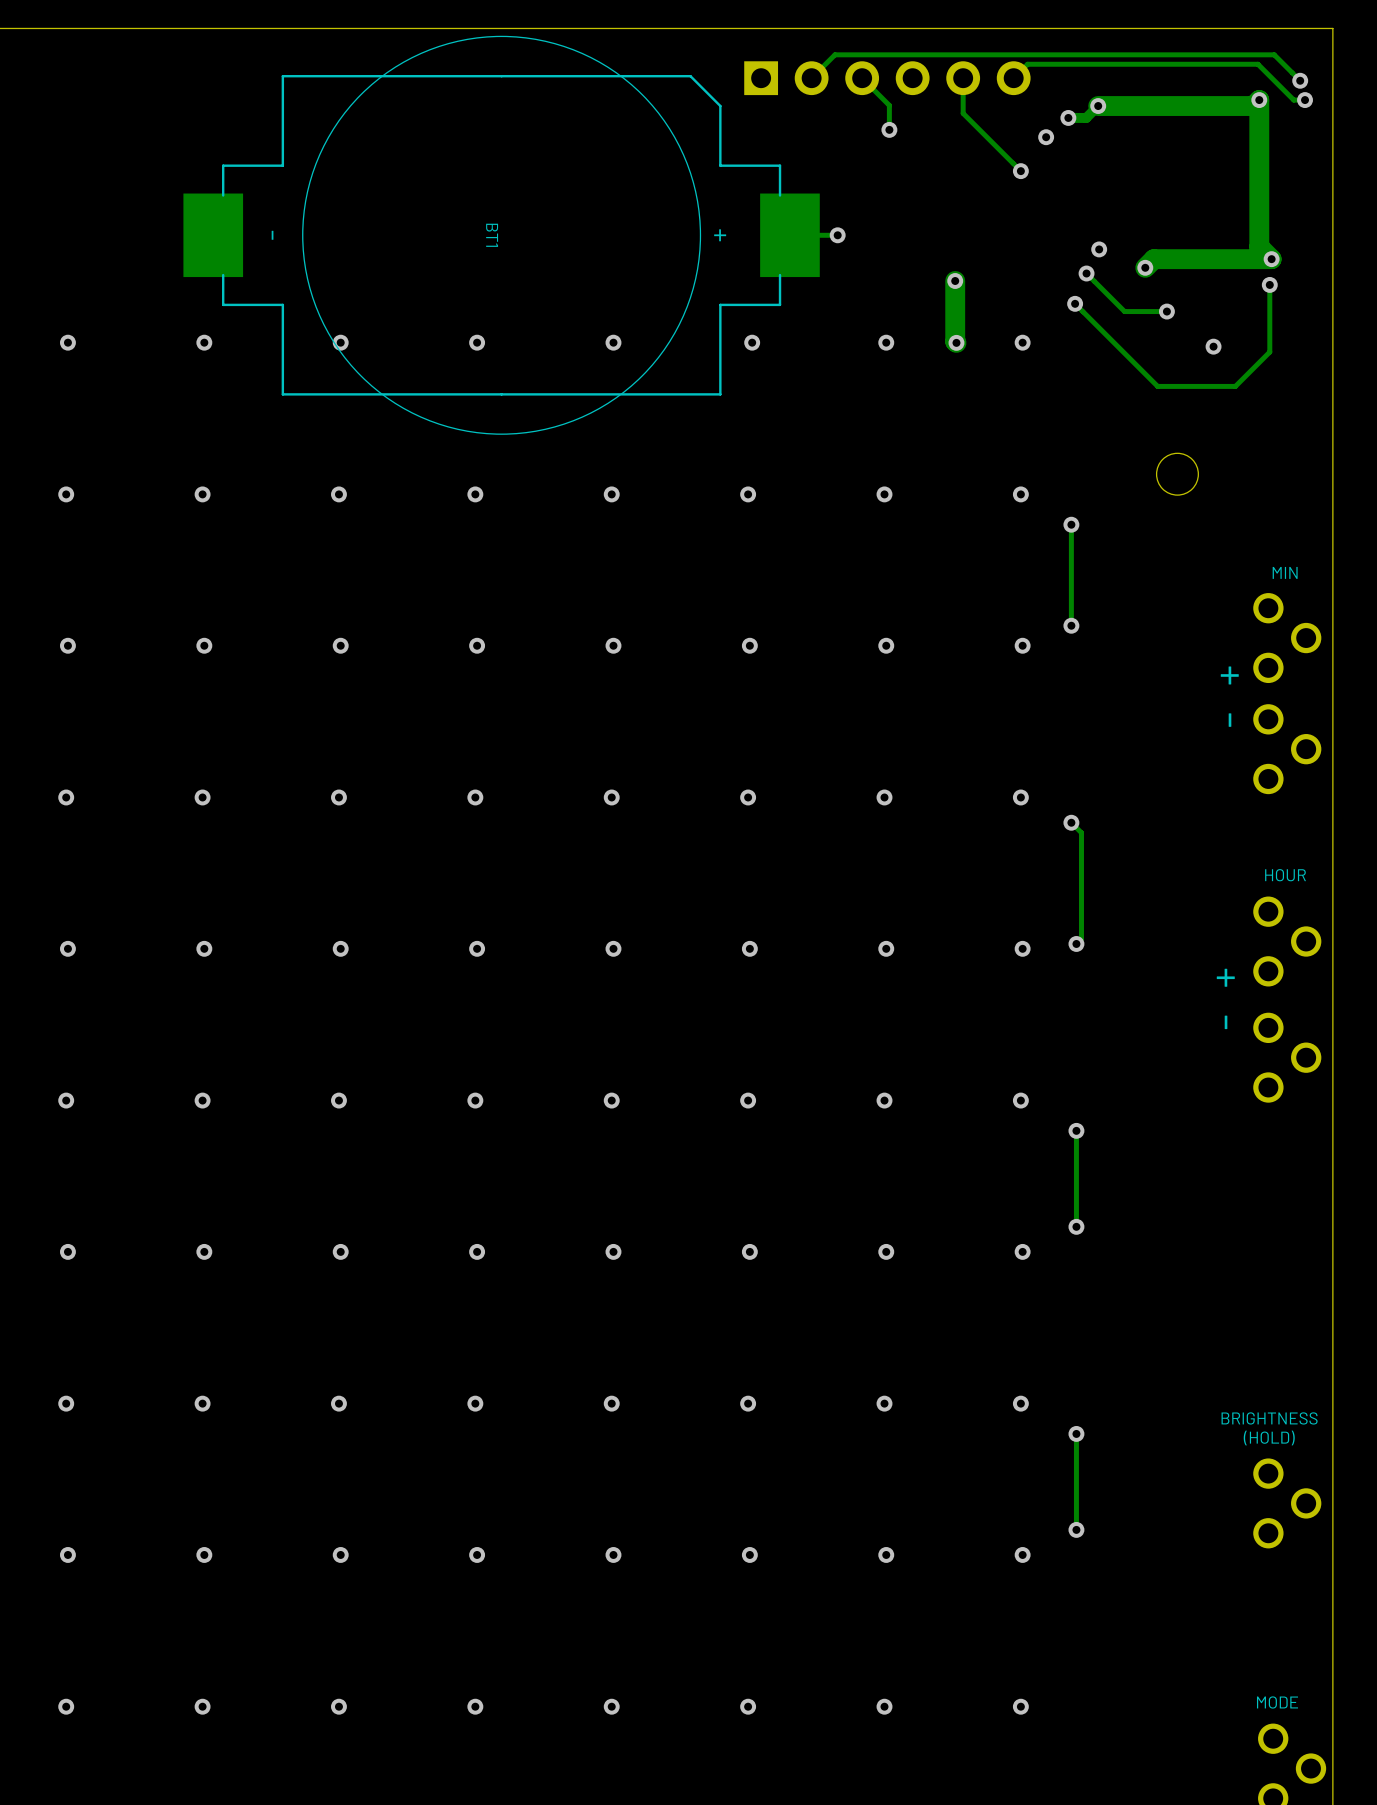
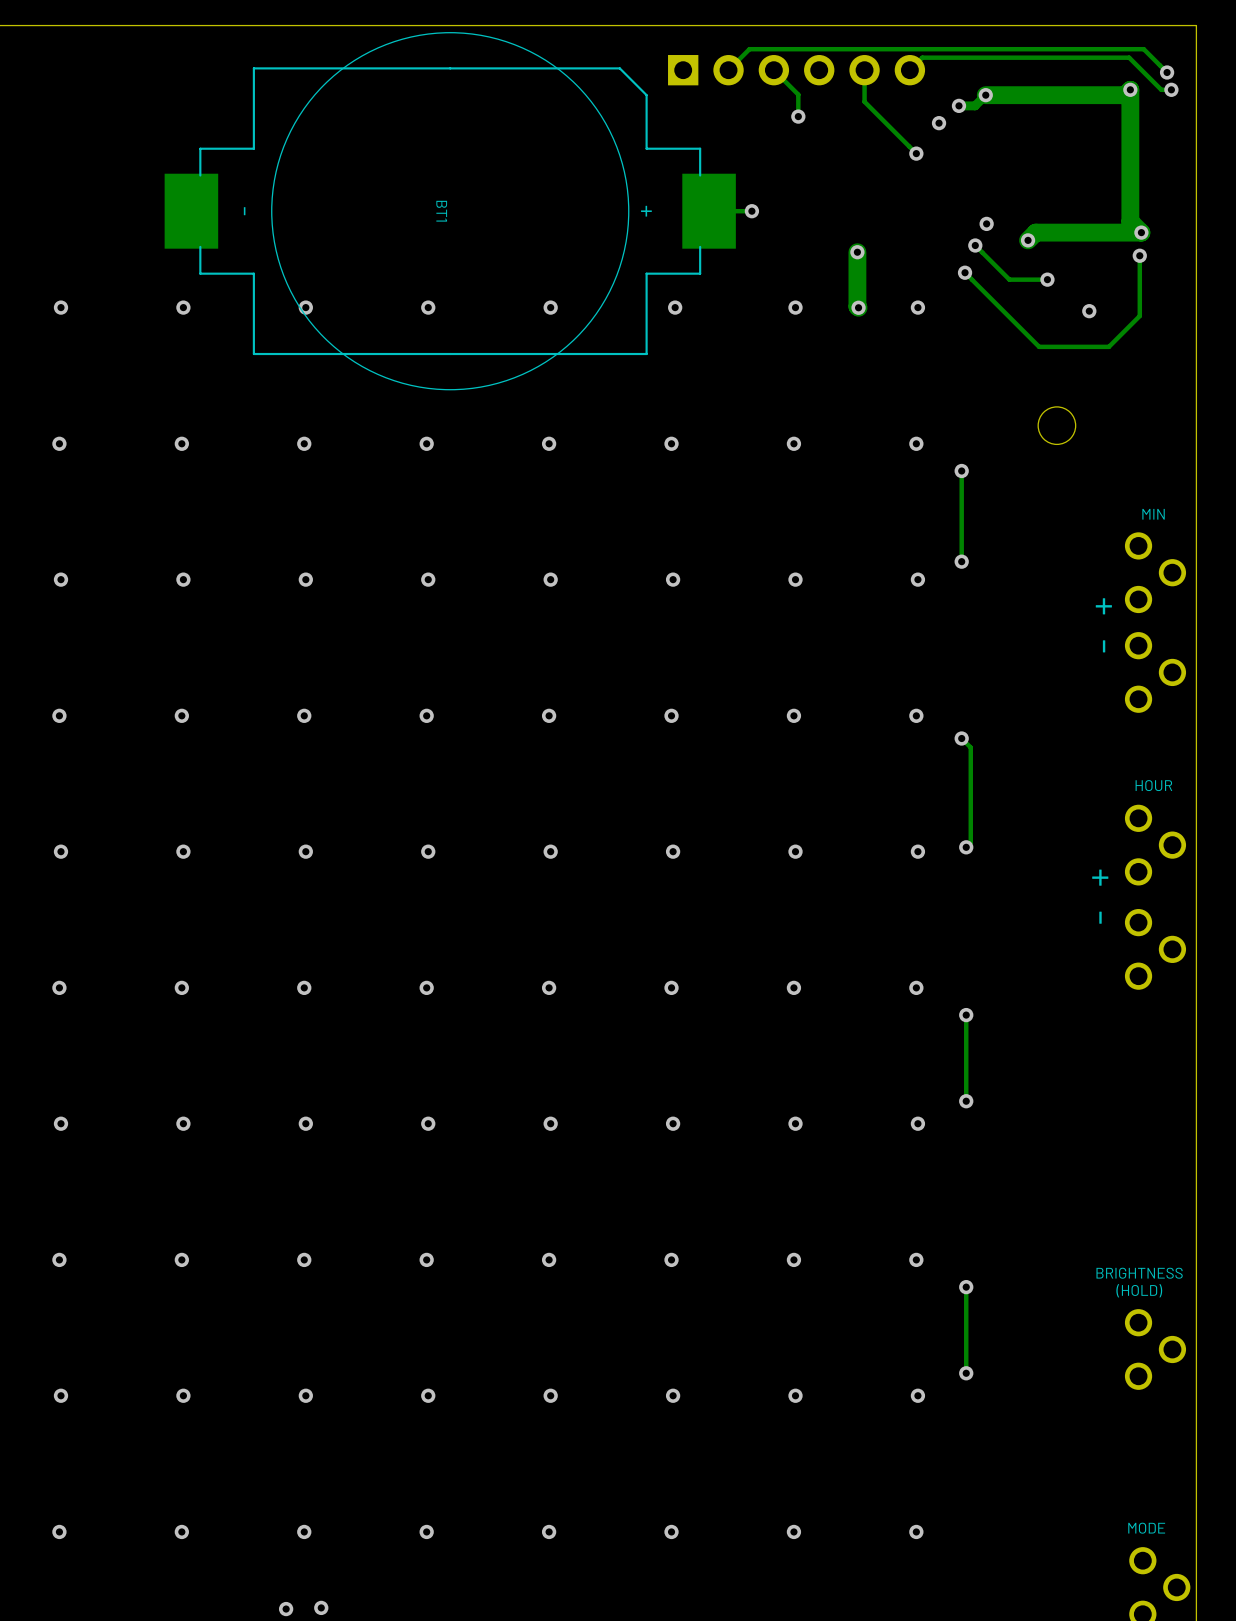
via: none -> (321, 1607)
via: none -> (286, 1609)

